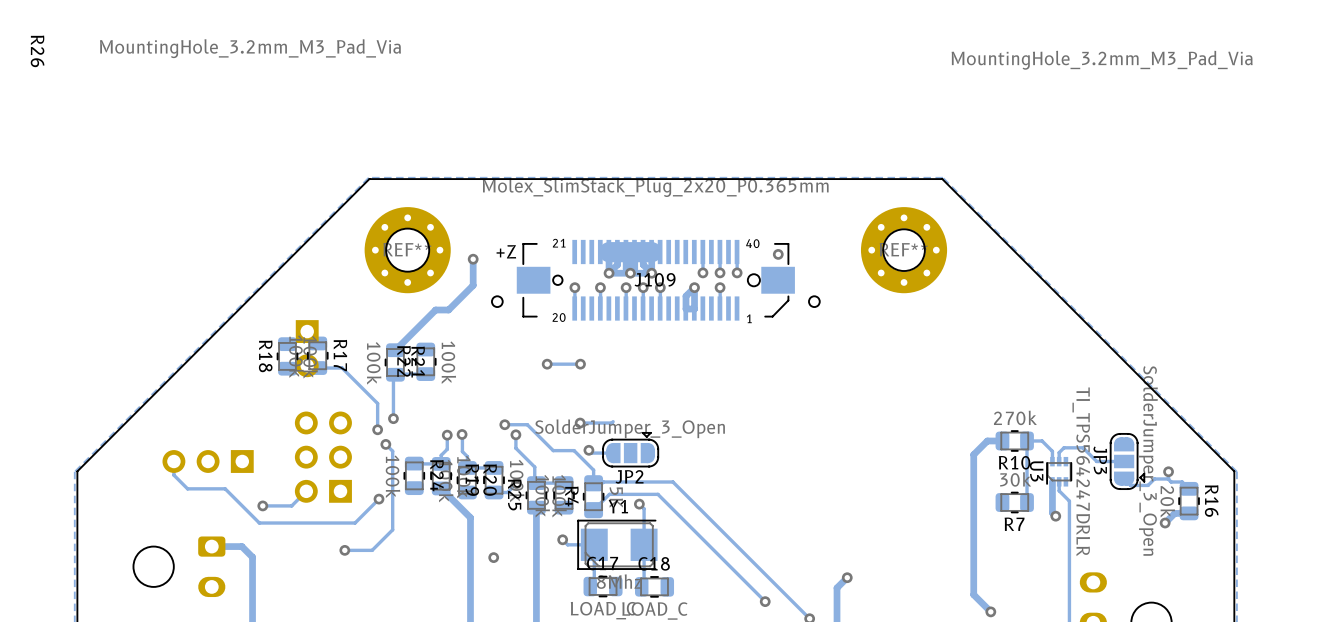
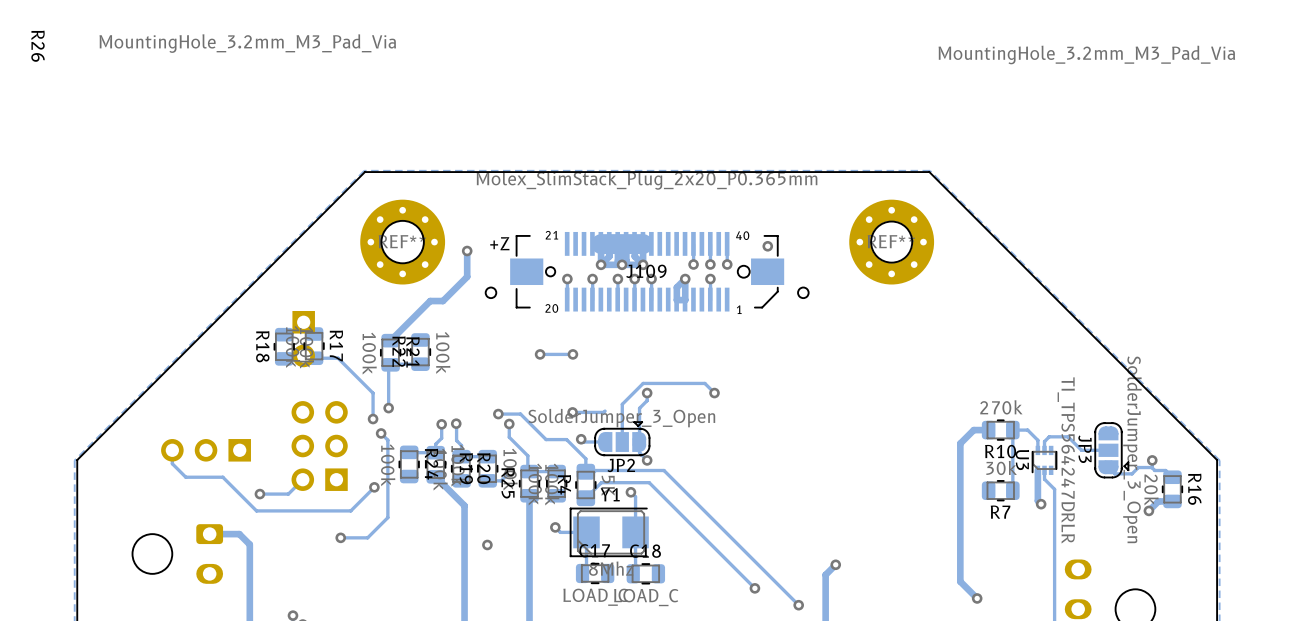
track: none -> (647, 393) (647, 400) (639, 408) (639, 452) (647, 460)
via: none -> (647, 393)
track: none -> (714, 393) (704, 383) (643, 383) (622, 404) (622, 442)
via: none -> (714, 393)
via: none -> (647, 460)

